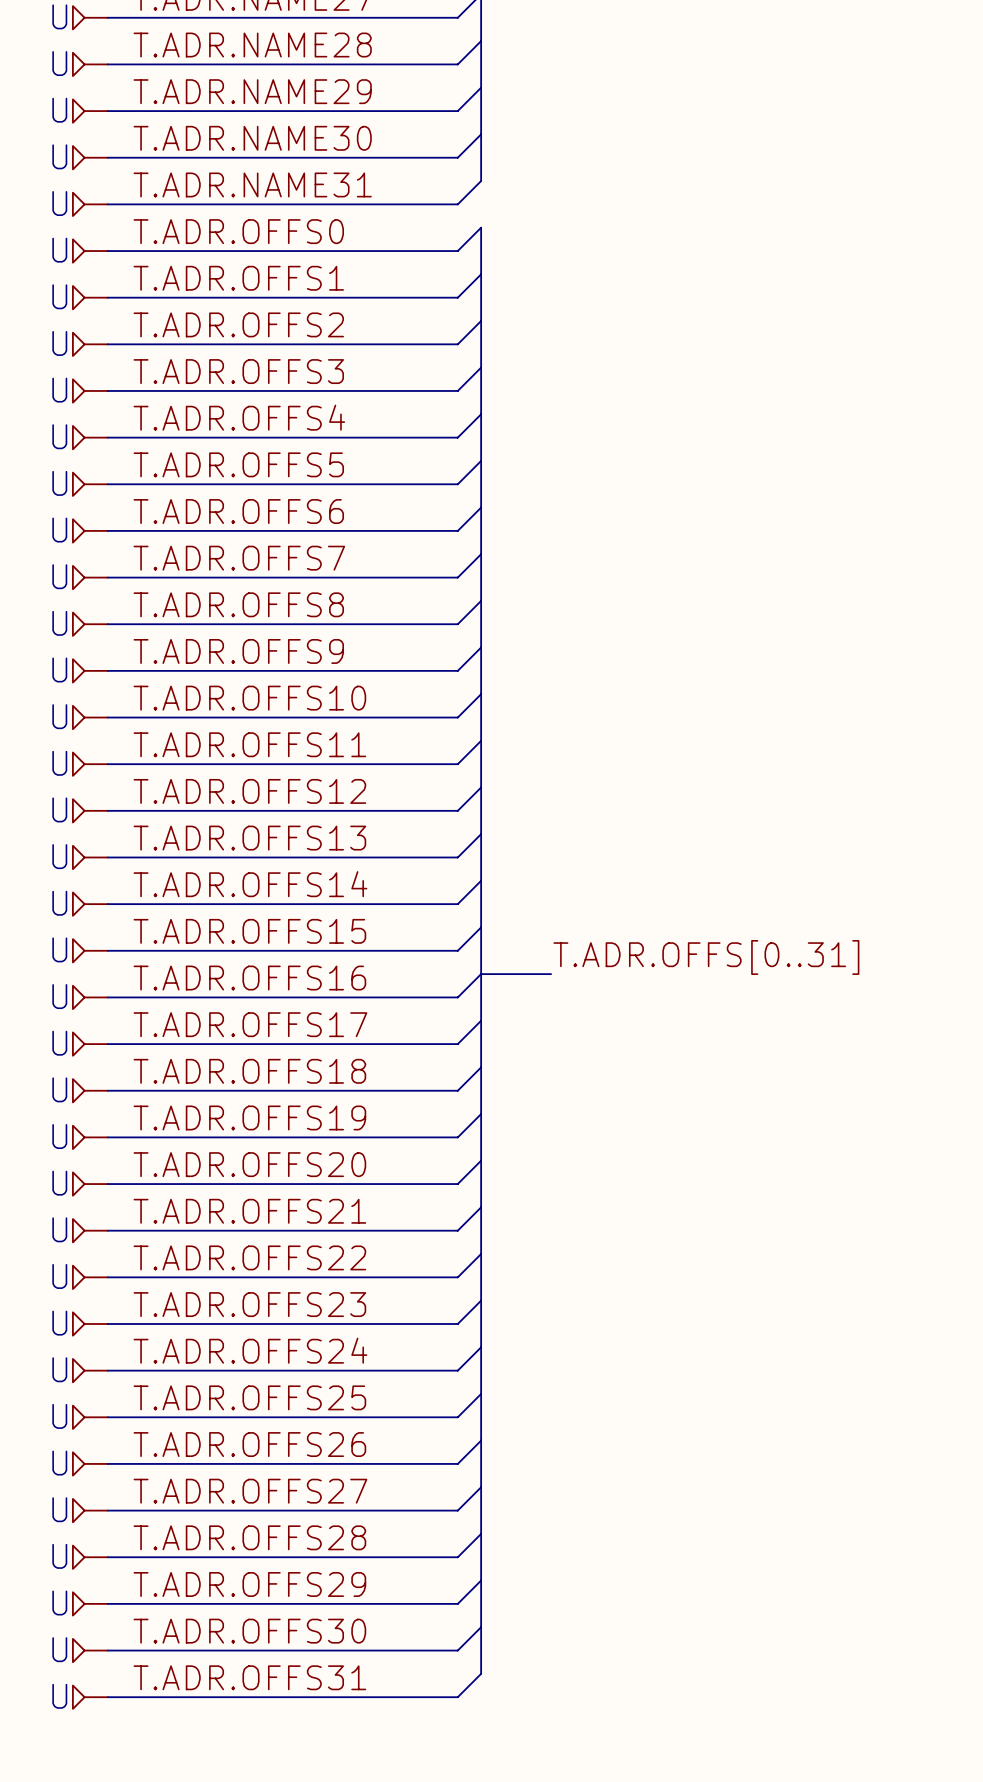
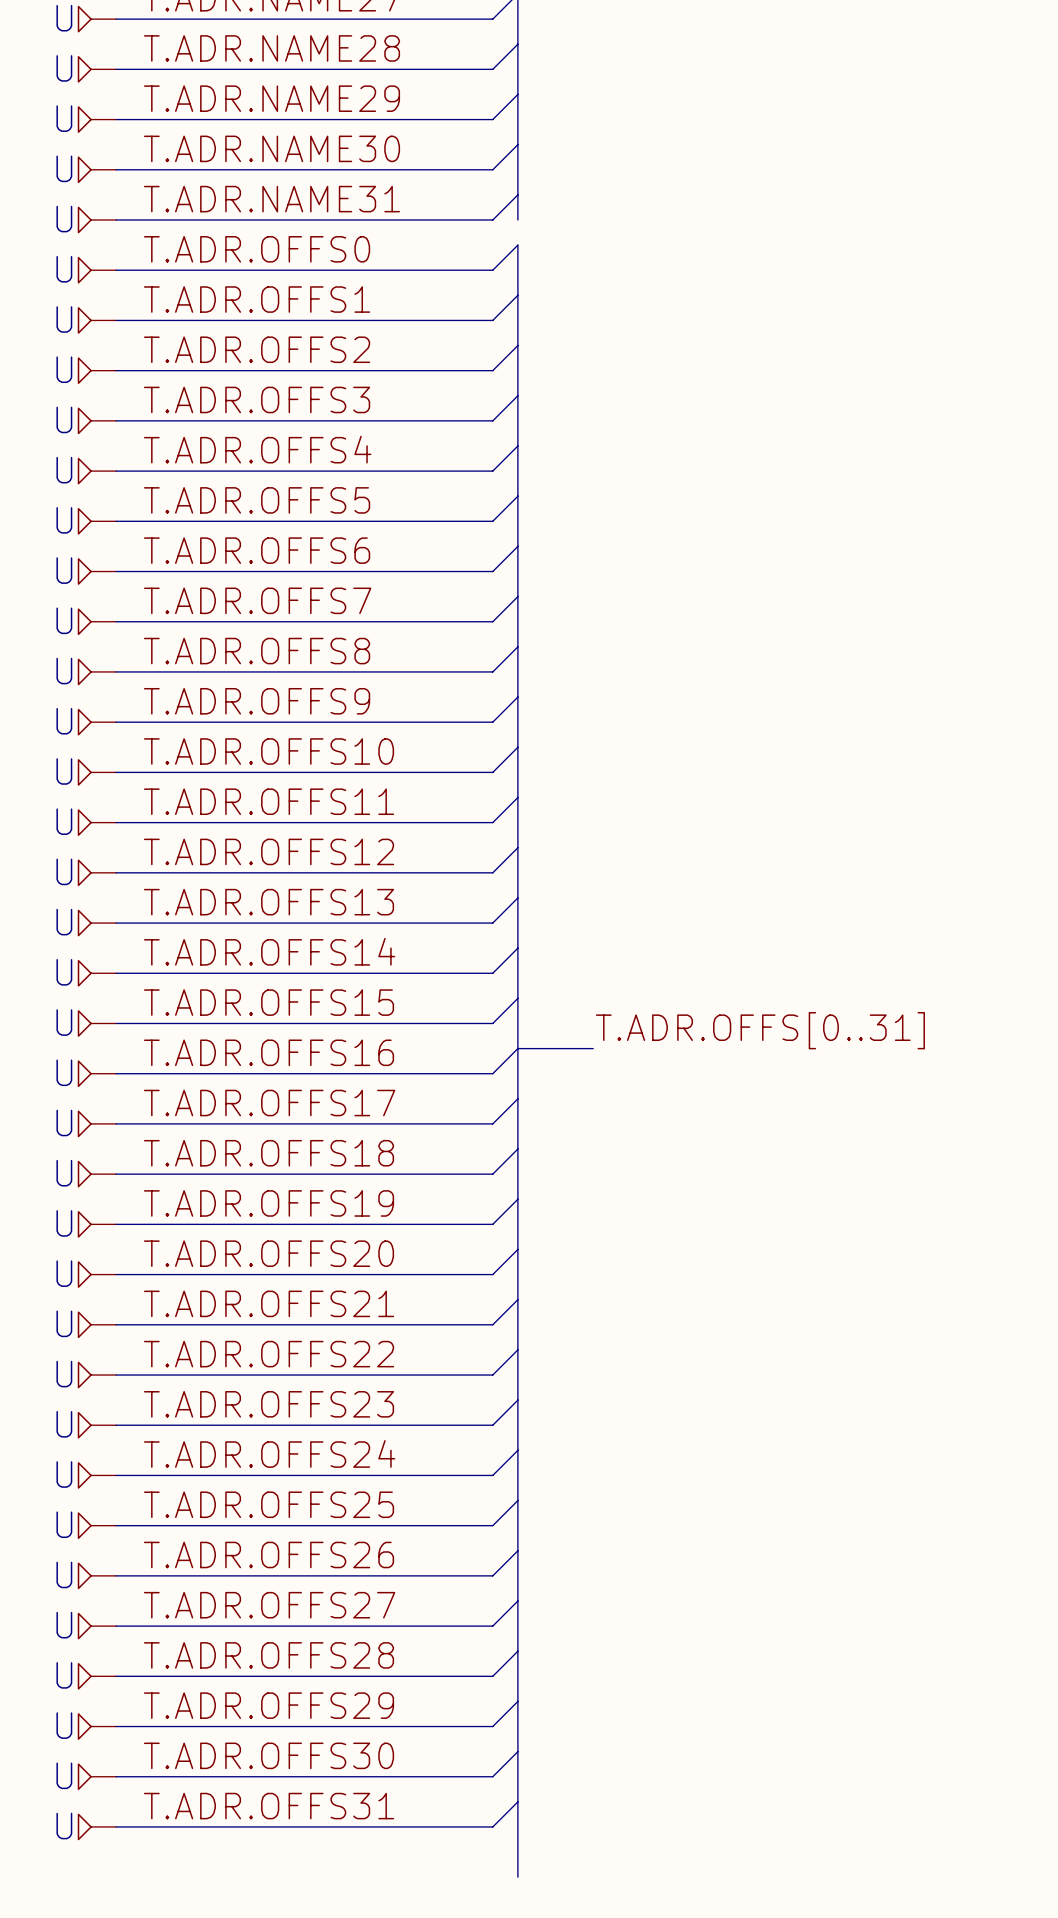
bus: none -> (517, 194) (517, 220)
bus: none -> (517, 1801) (517, 1877)

